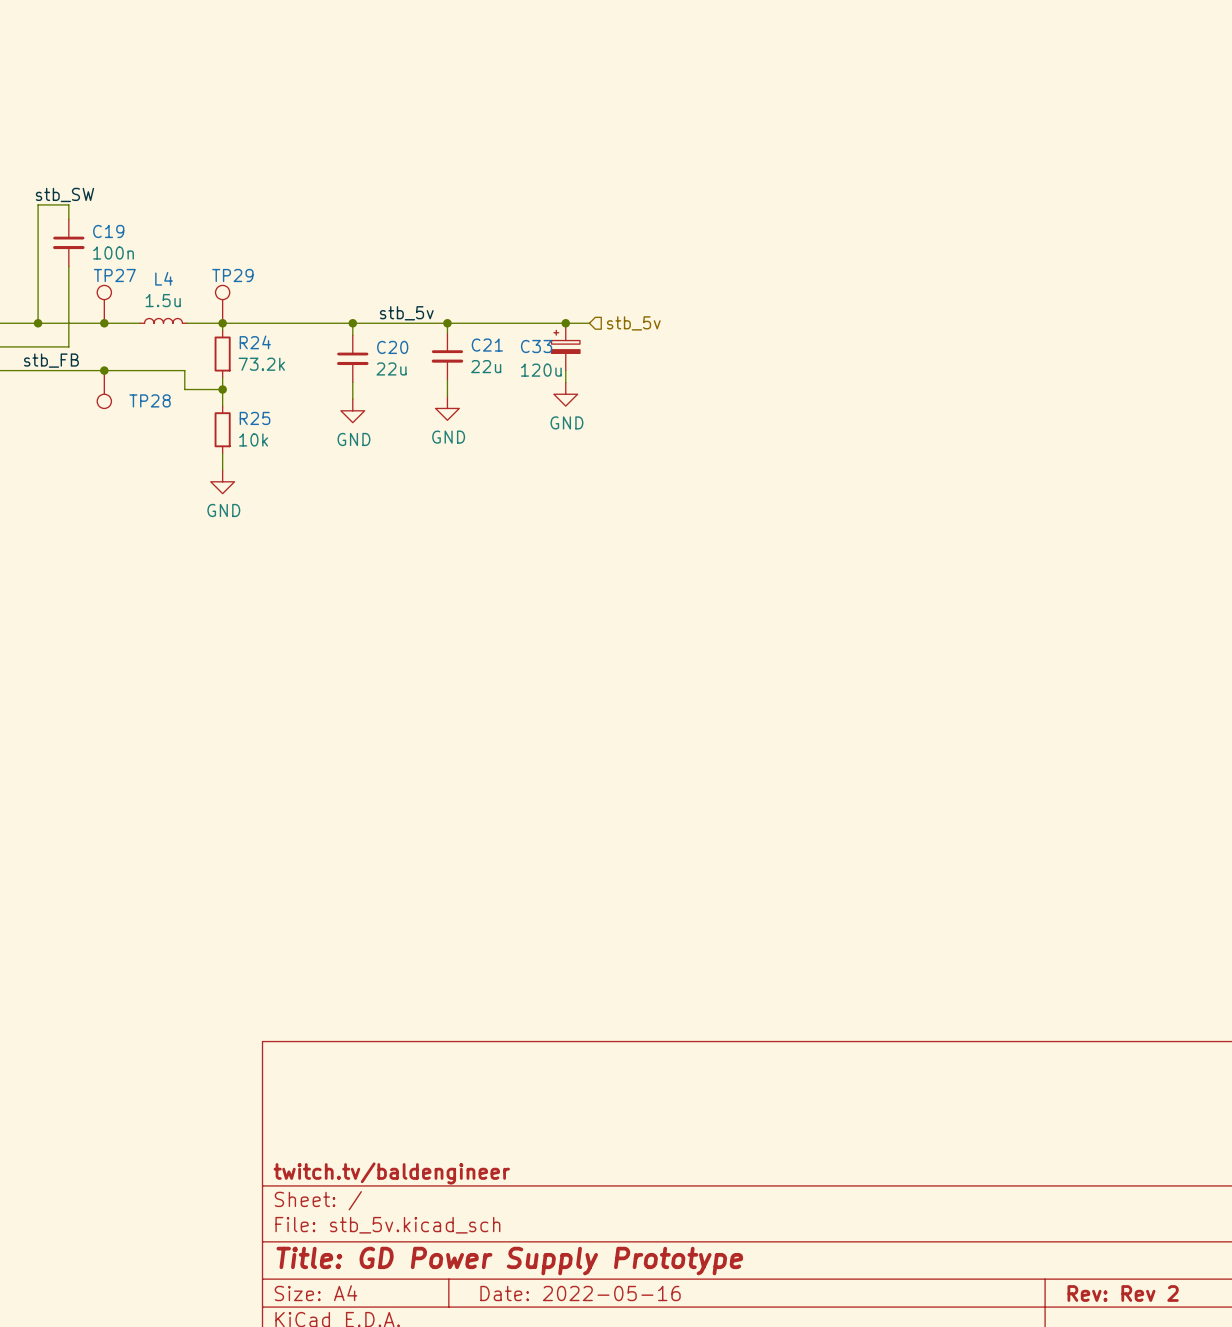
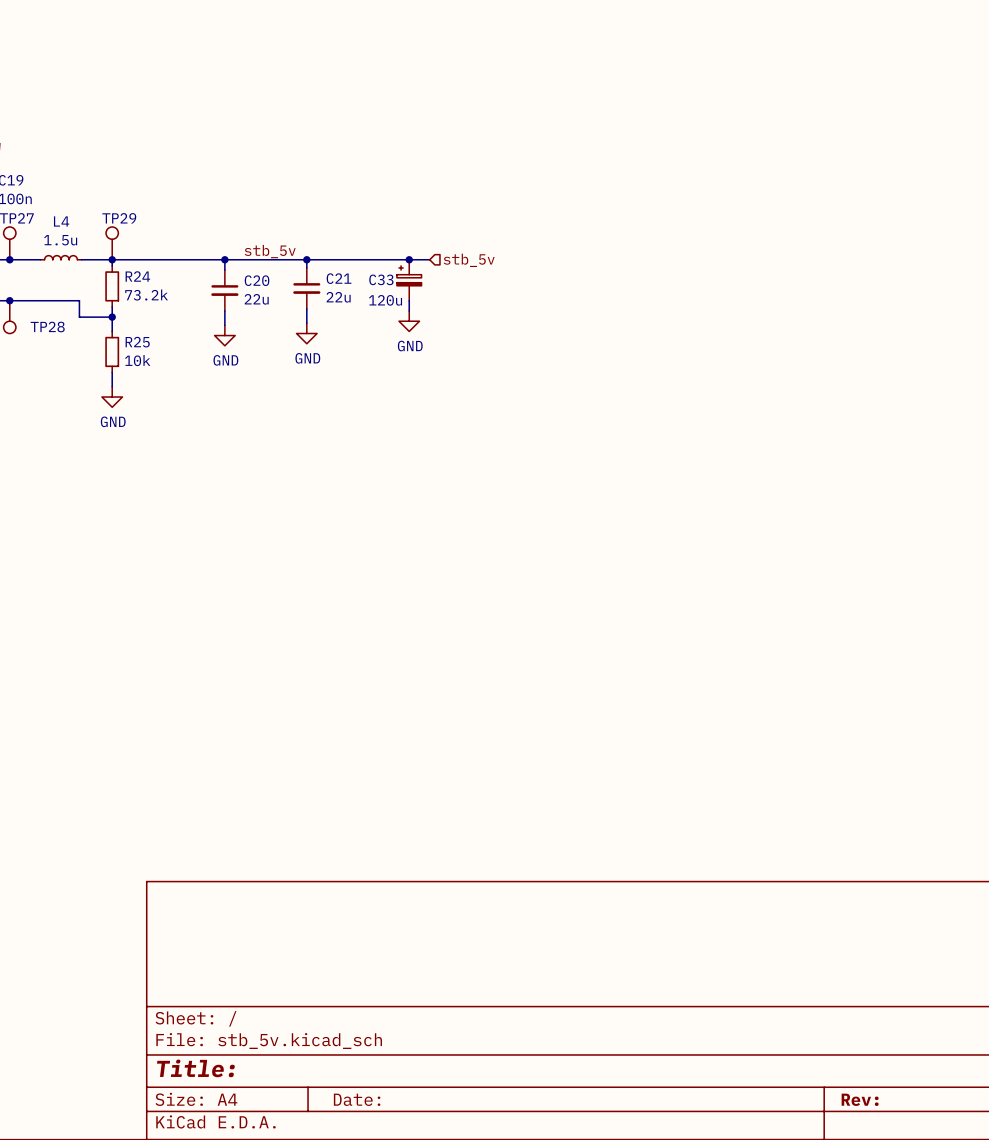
title block: twitch.tv/baldengineer (391, 1173) -> none
title block: Title: GD Power Supply Prototype (509, 1261) -> Title: (195, 1068)
title block: Date: 2022-05-16 (580, 1293) -> Date: (357, 1099)
title block: Rev: Rev 2 (1123, 1293) -> Rev: (860, 1099)

